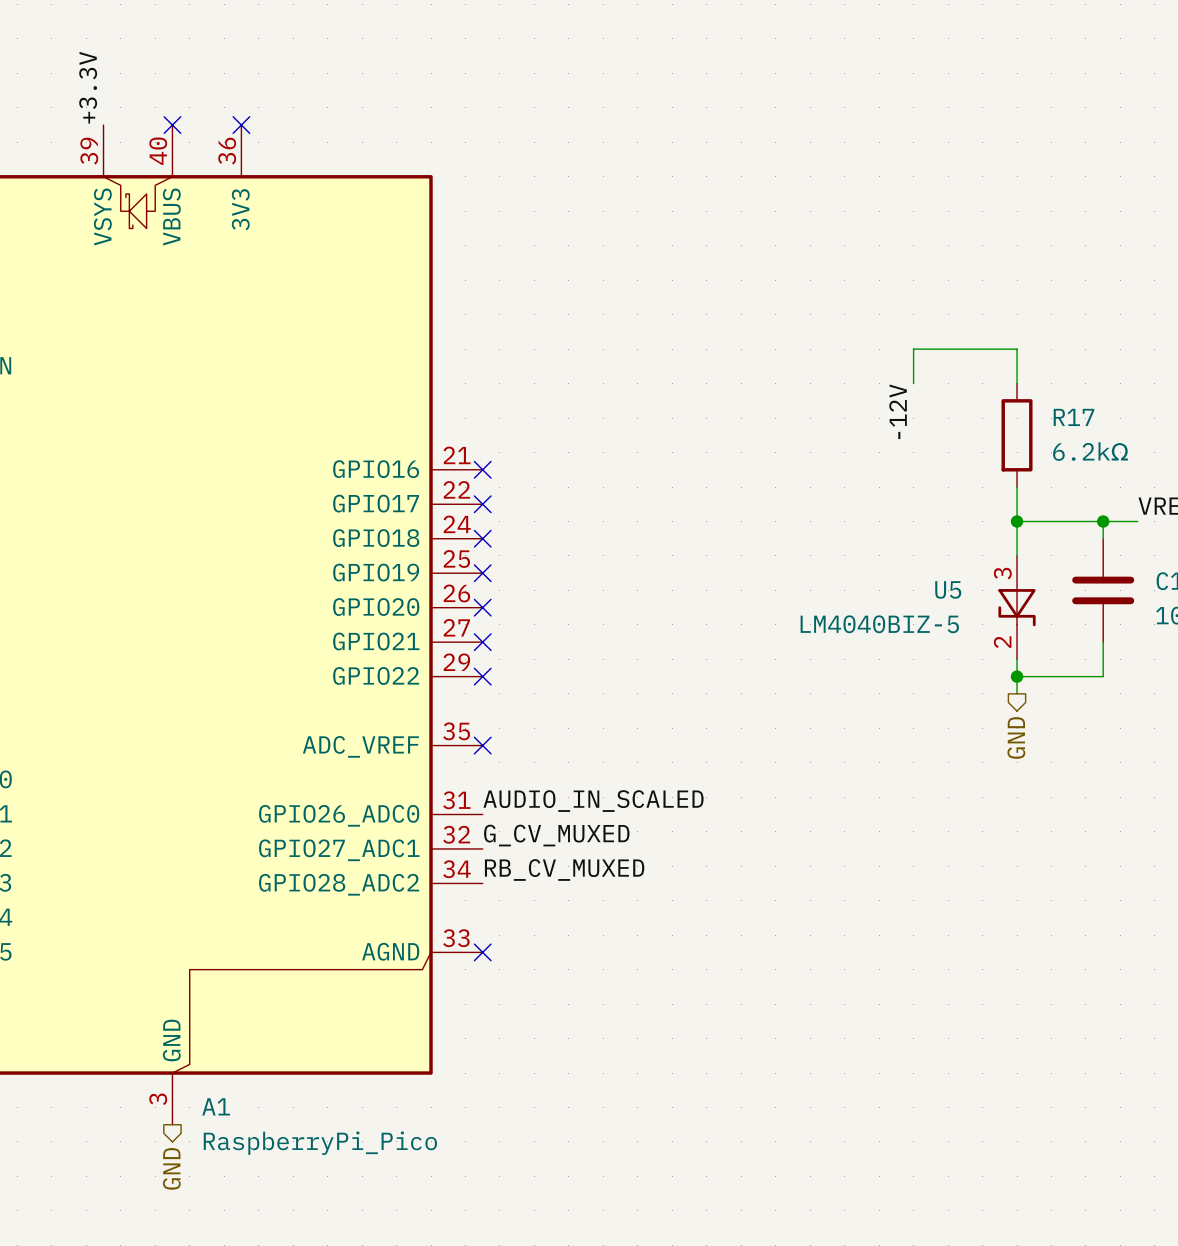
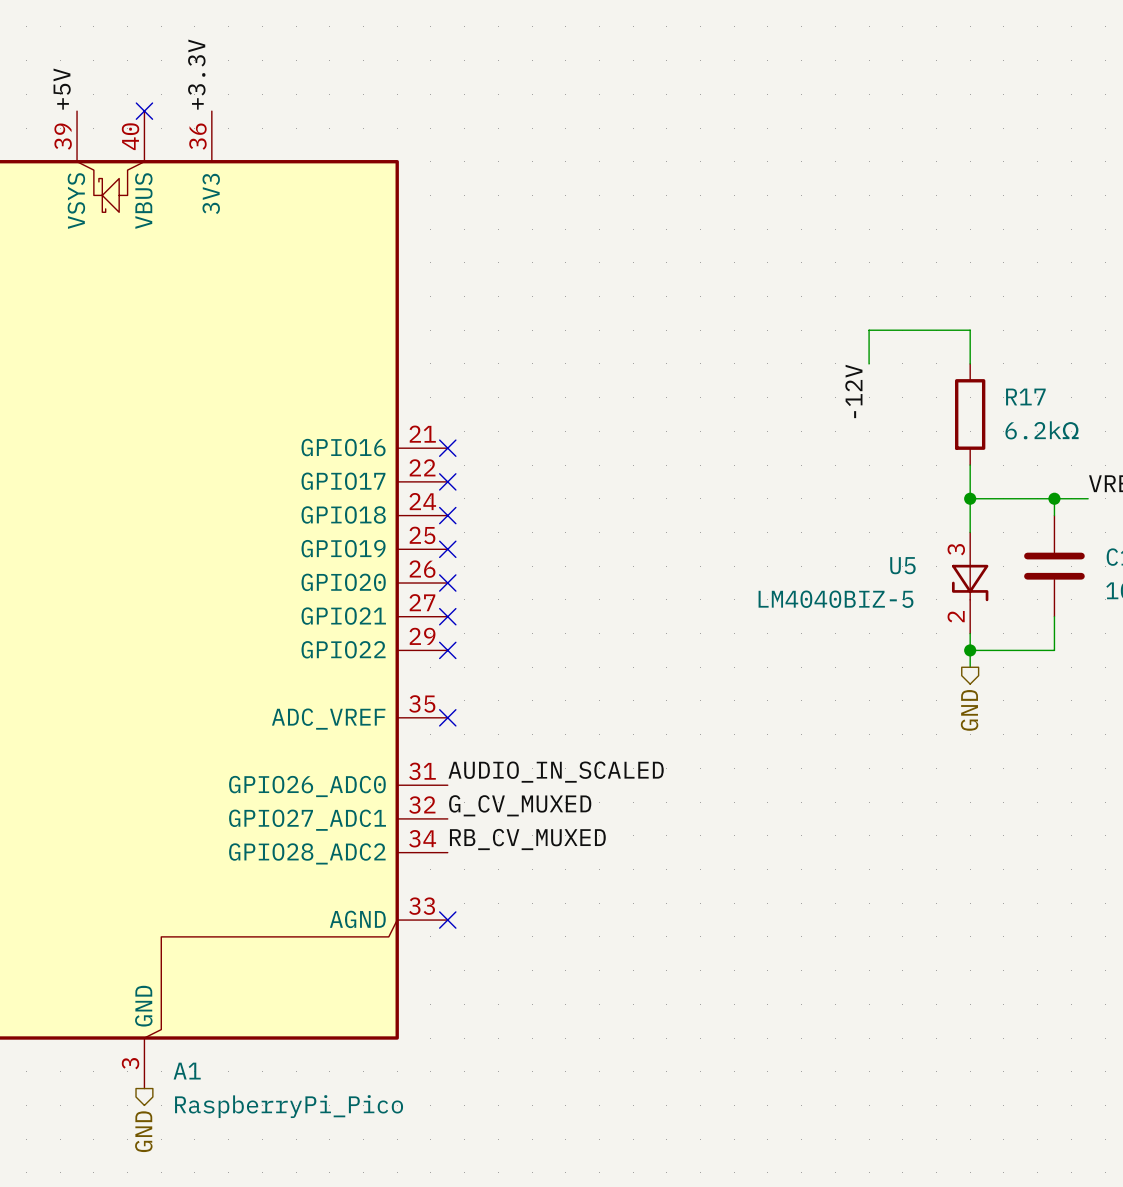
label: +3.3V (88, 87) -> +5V (62, 89)
label: none -> +3.3V (196, 74)
no-connect mark: (241, 125) -> none

